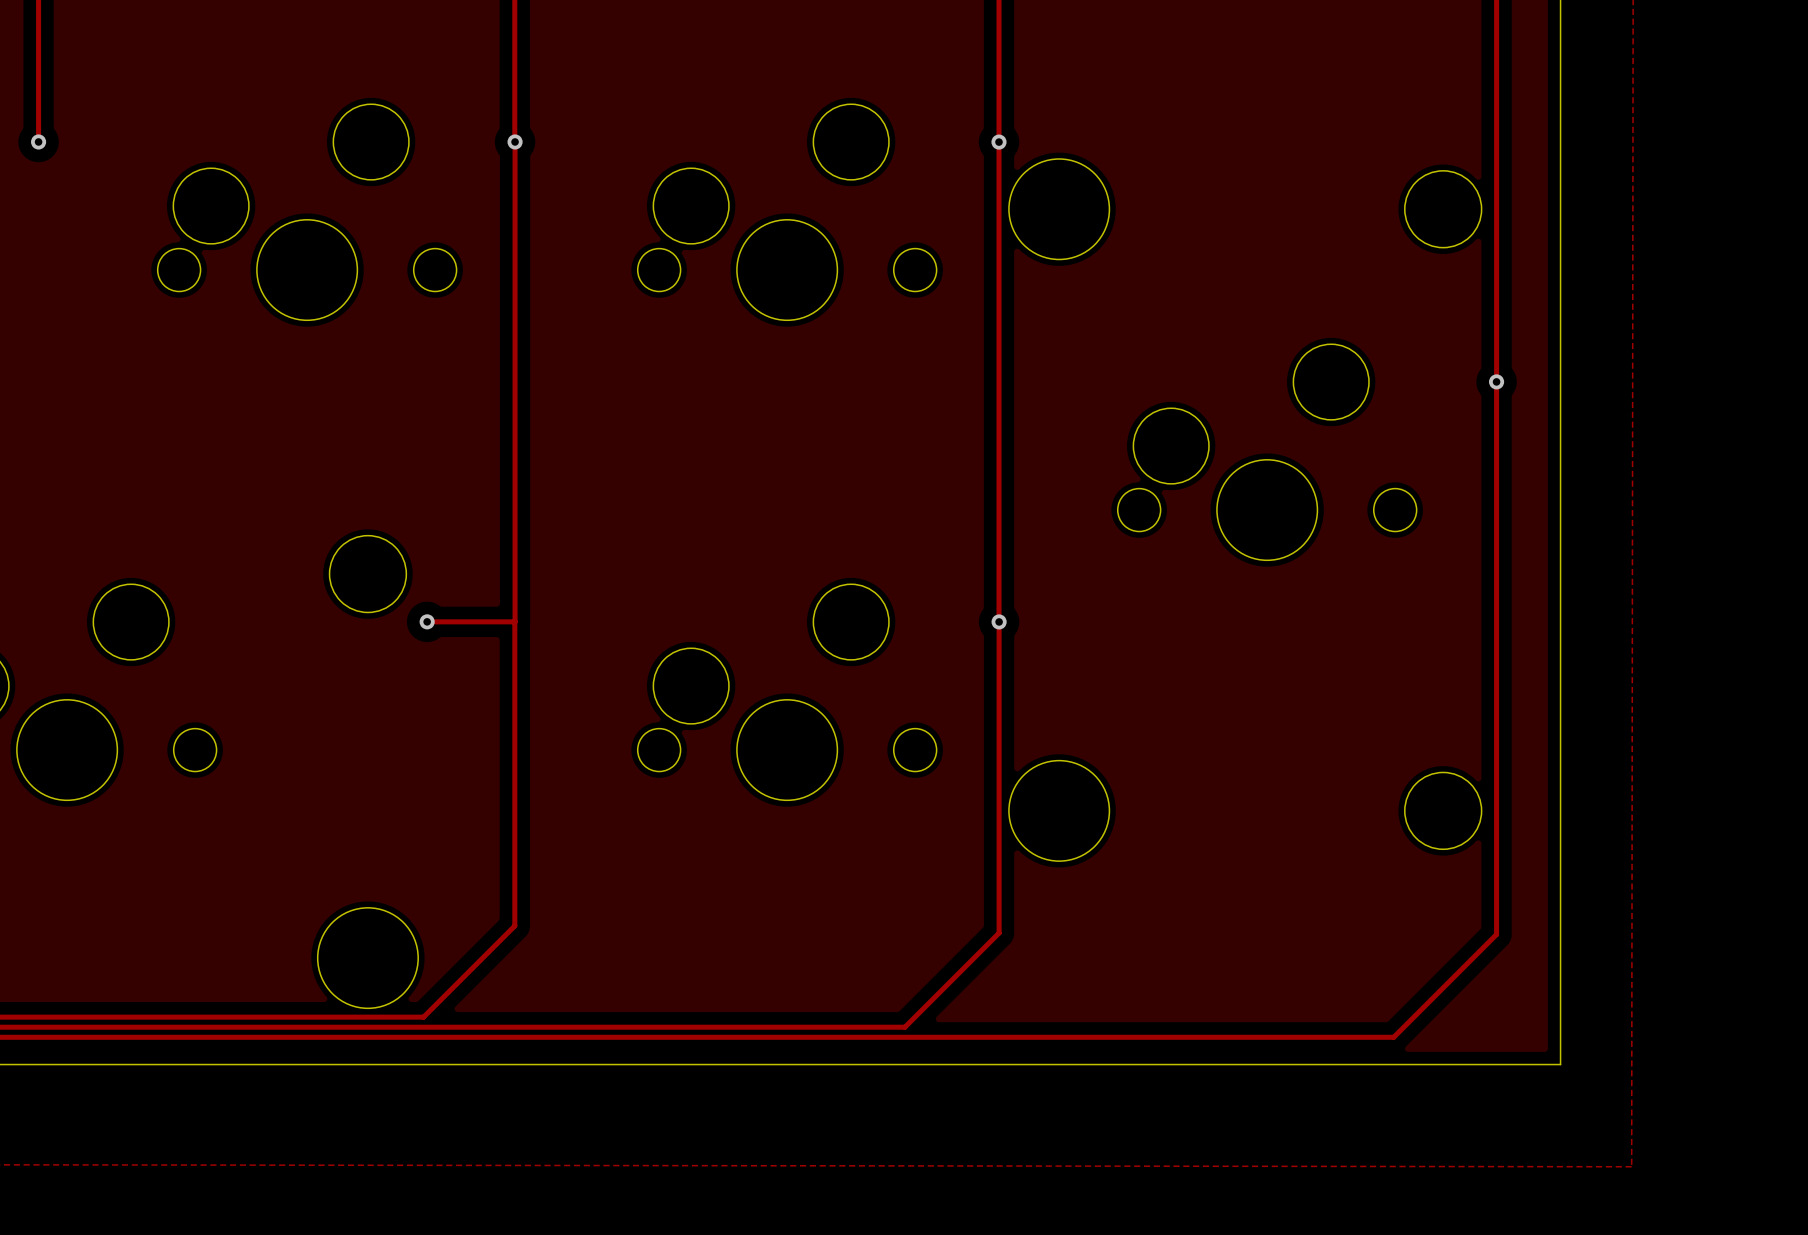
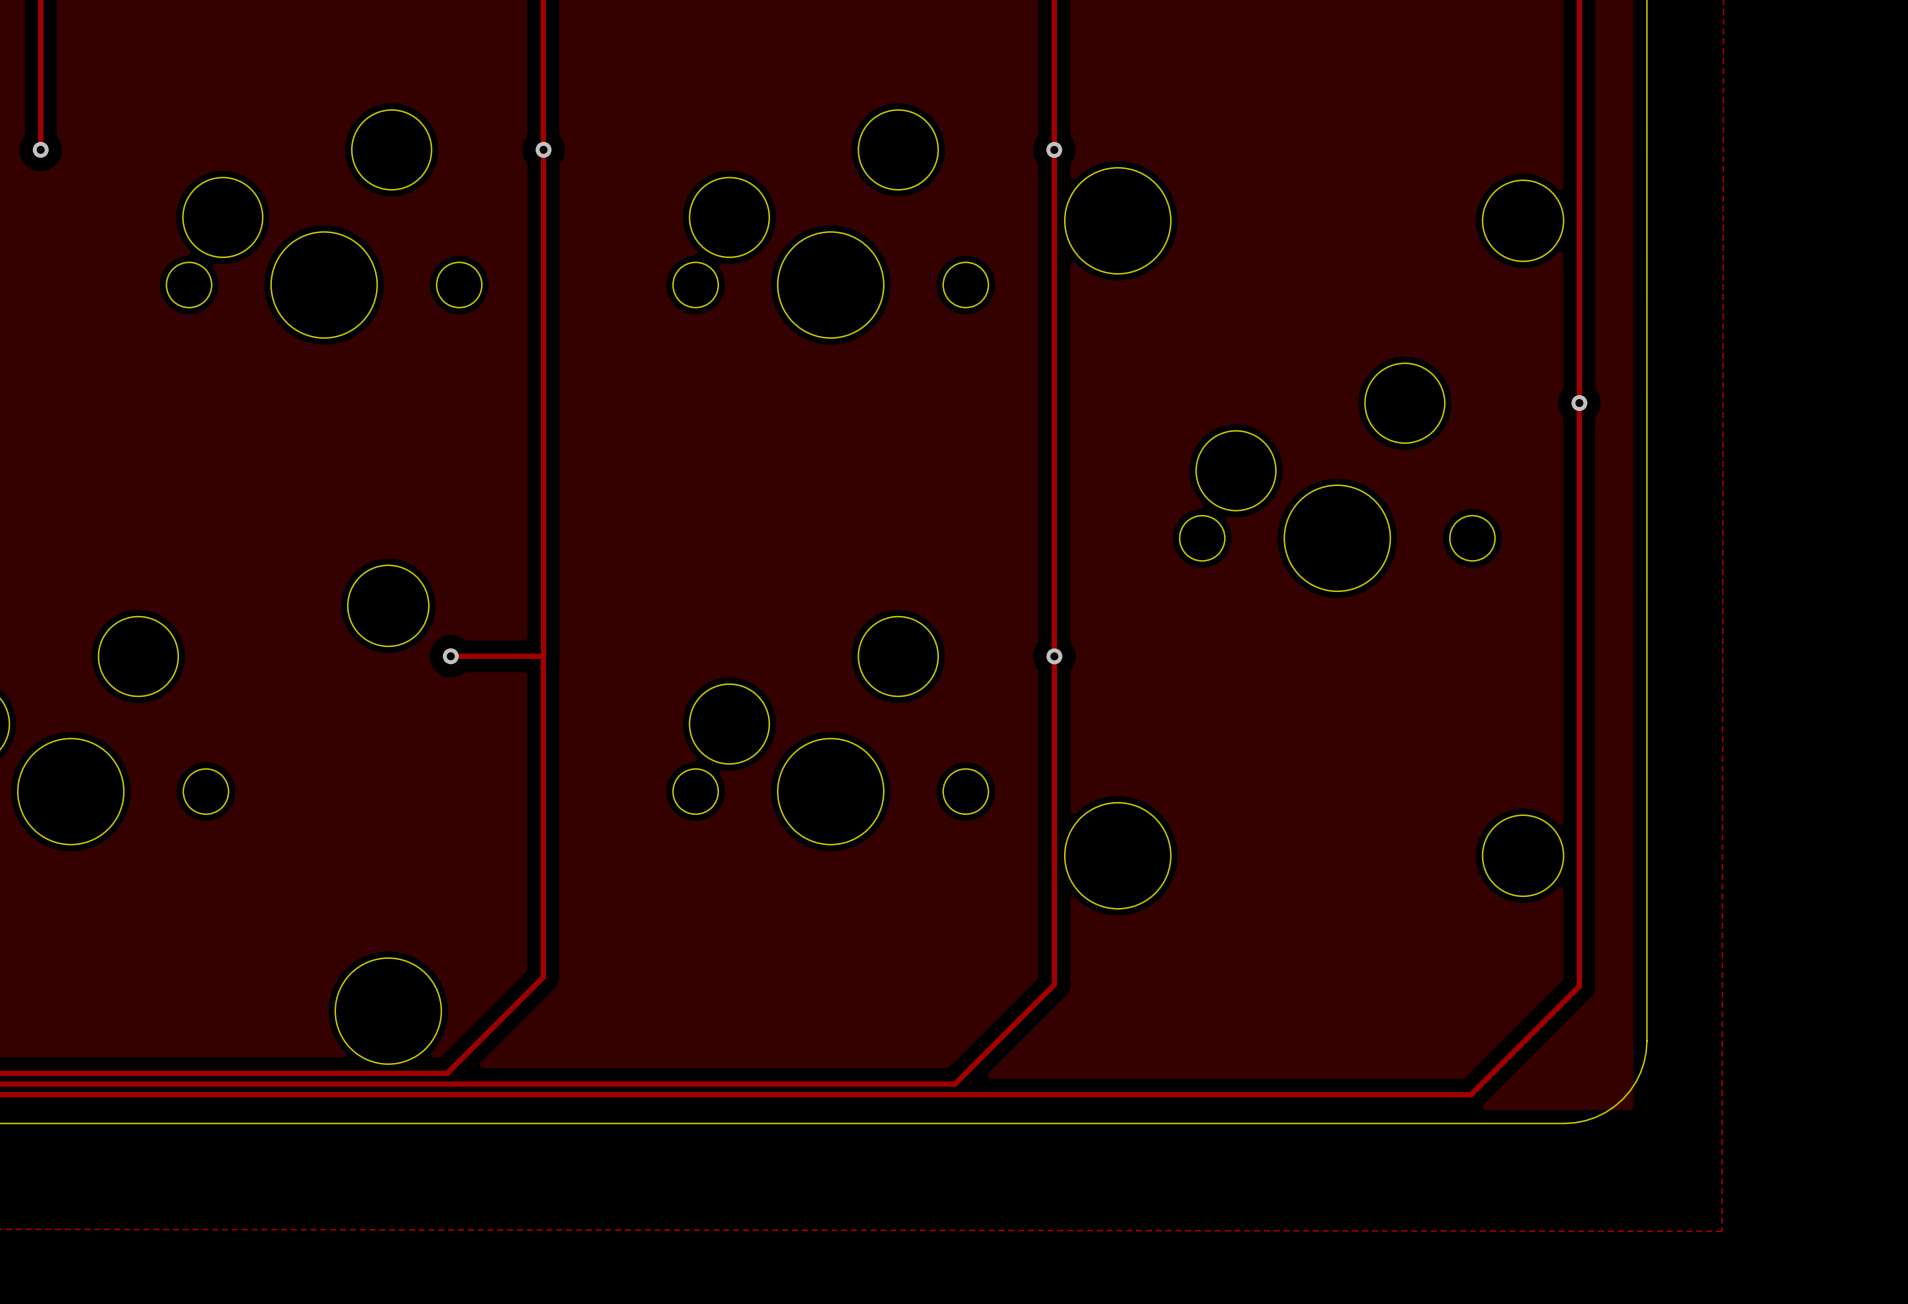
board edge: (1560, 986) (1560, 1064) (1482, 1064) -> (1646, 1040) (1640, 1072) (1622, 1099) (1596, 1117) (1564, 1123)

